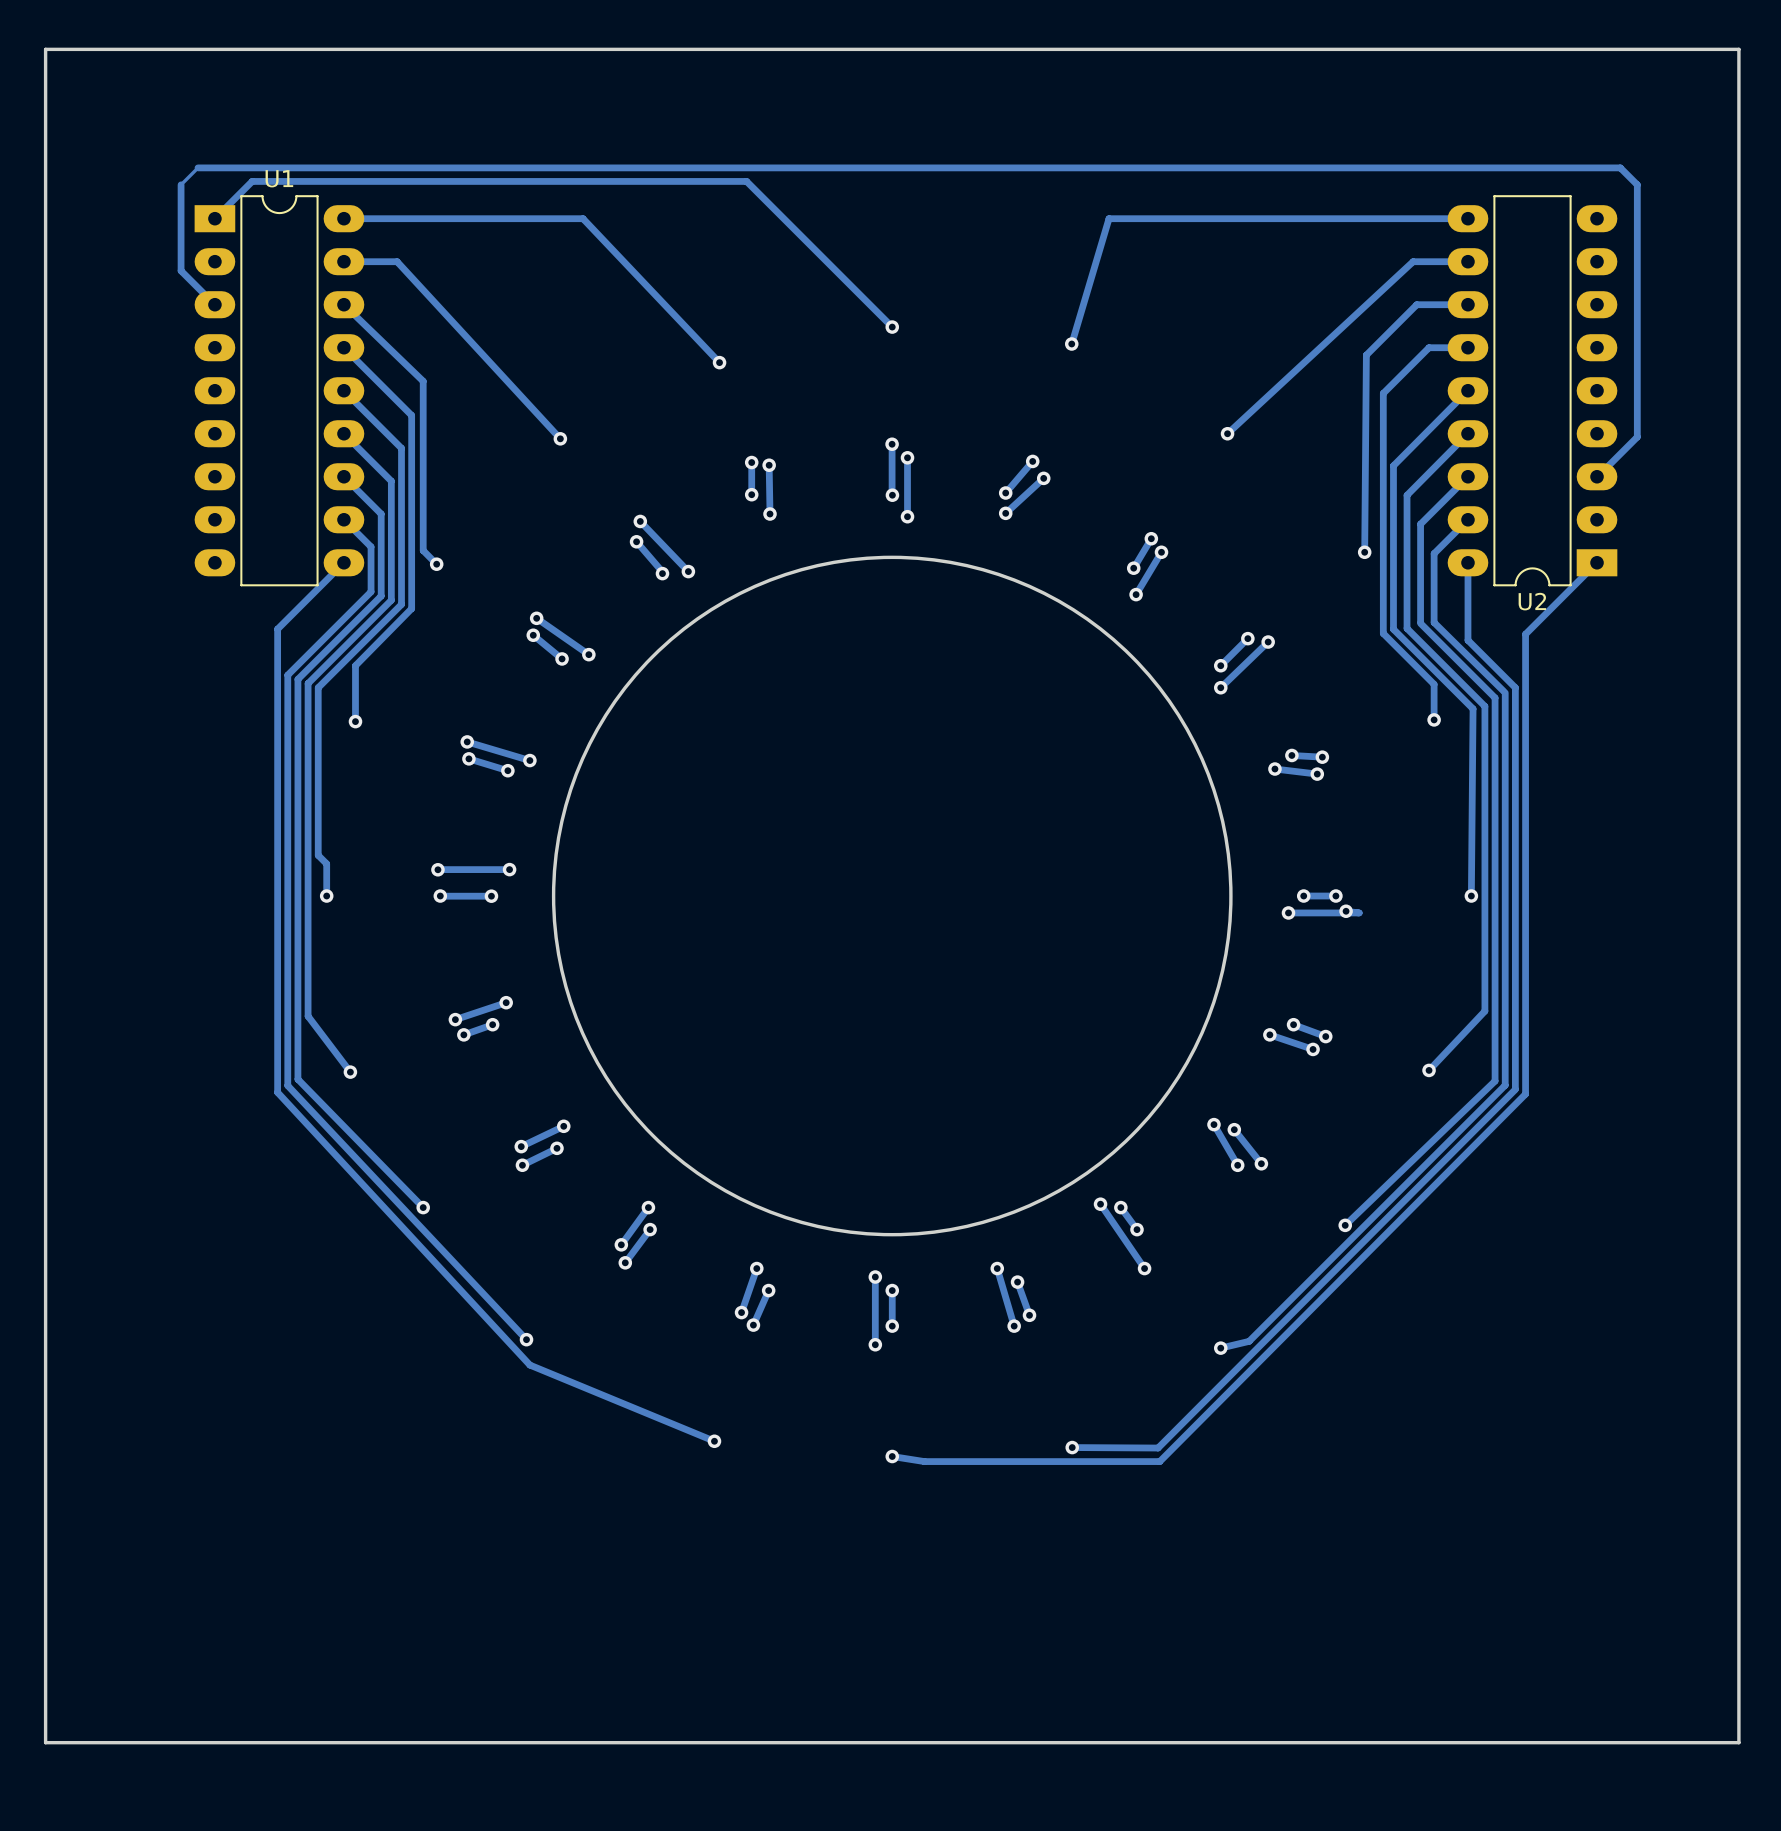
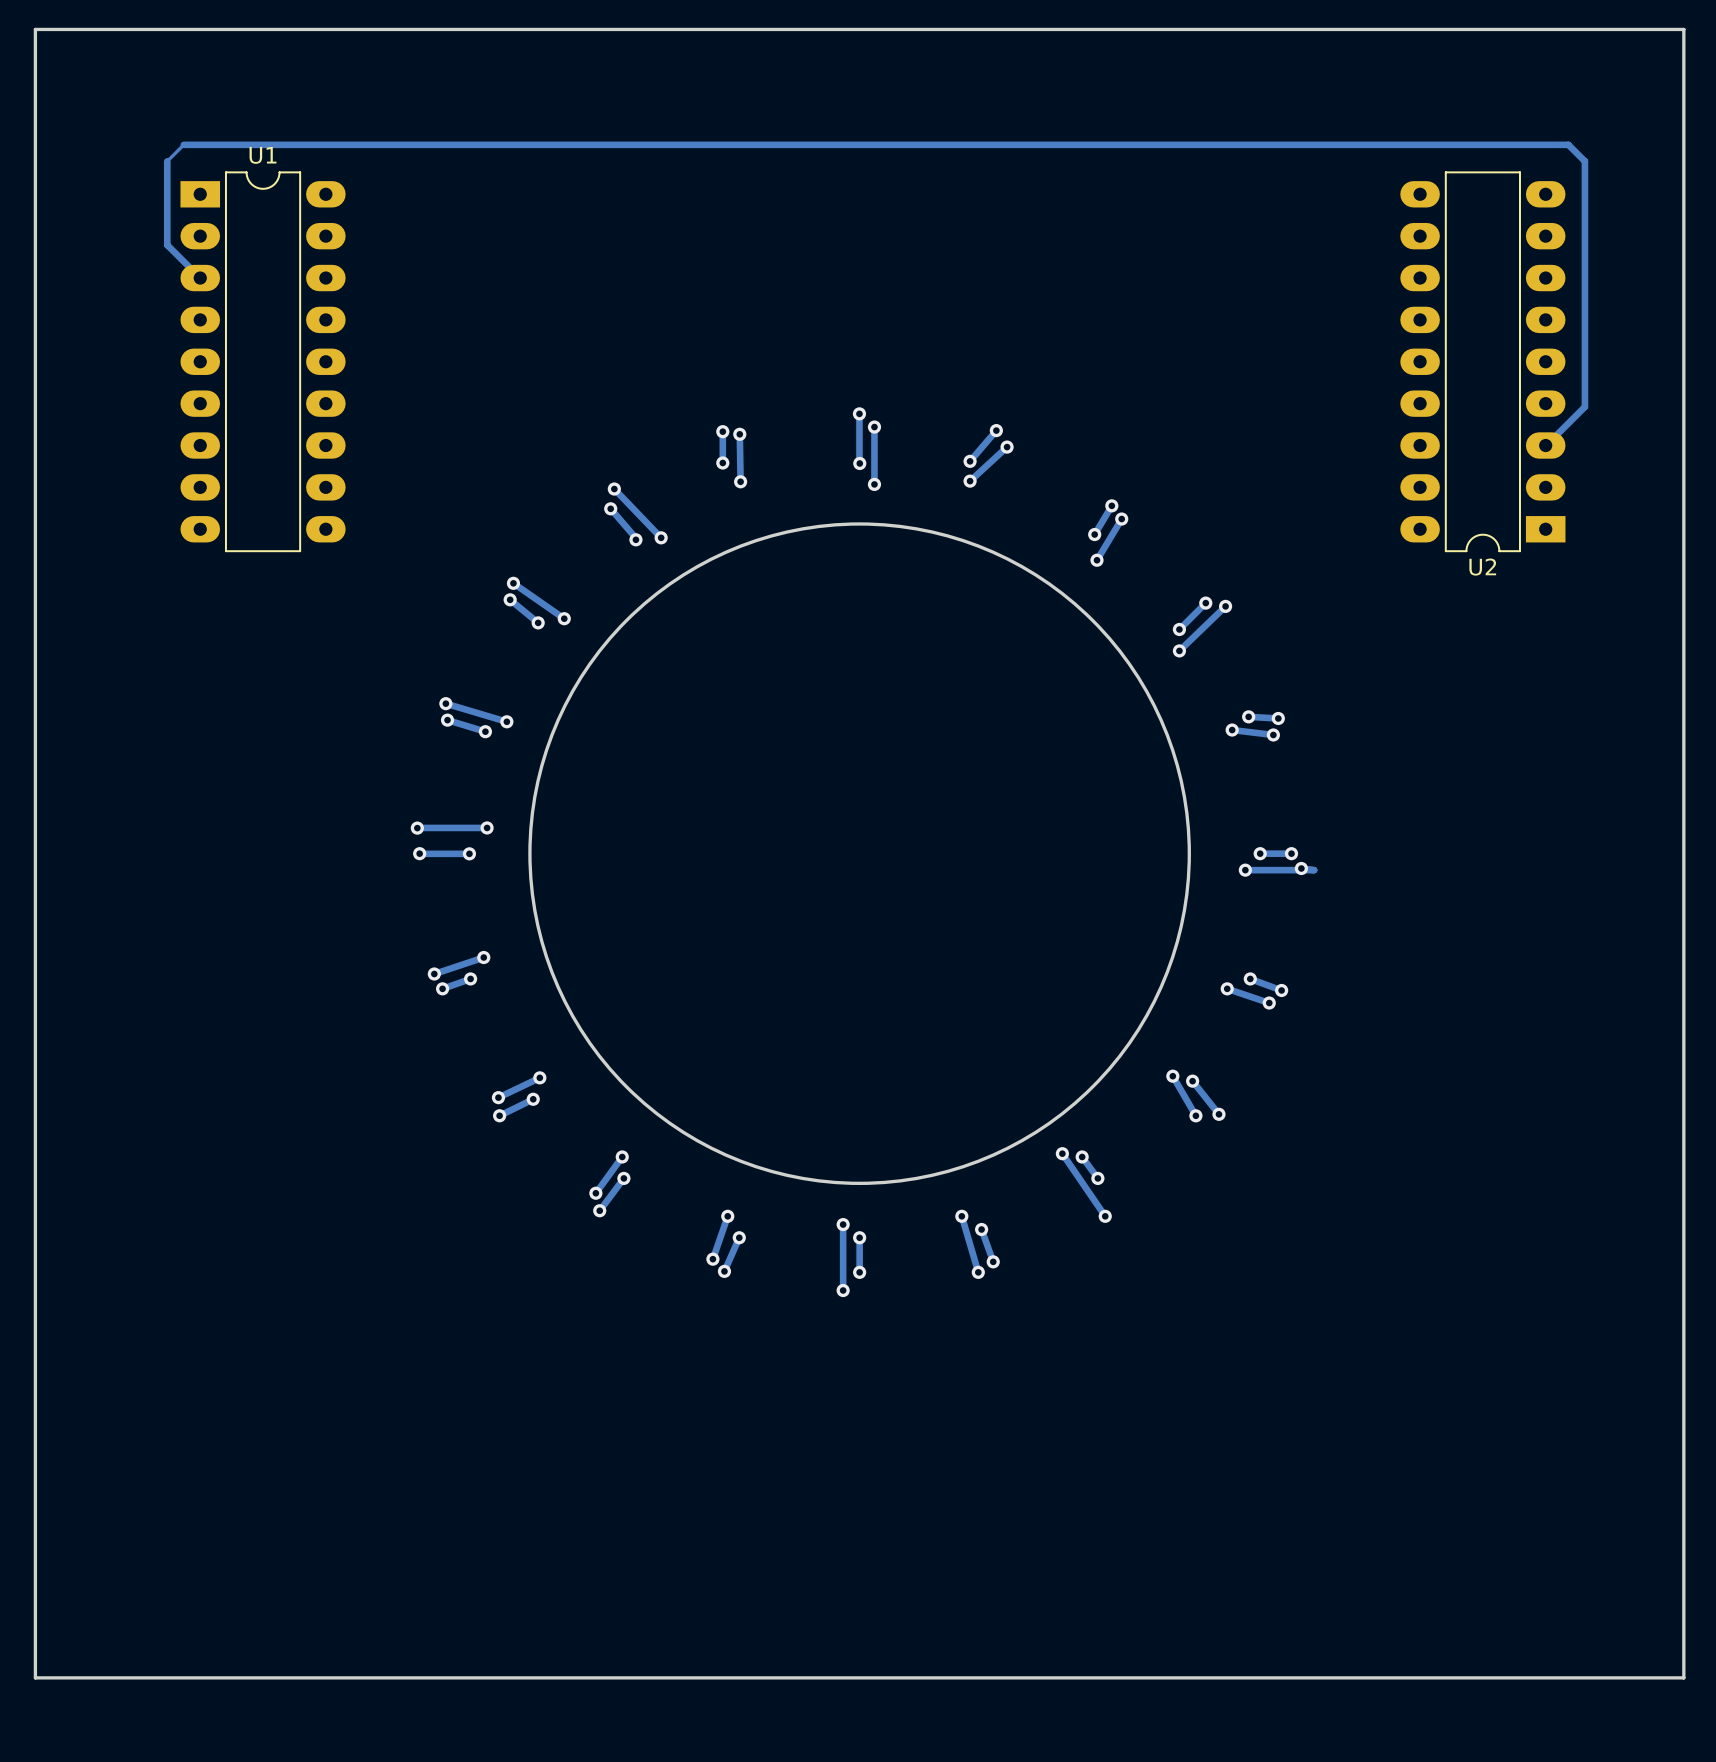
track: (214, 218) (252, 181) (746, 181) (892, 327) -> none
track: (343, 218) (583, 218) (719, 362) -> none
track: (1467, 218) (1109, 218) (1071, 344) -> none
track: (343, 261) (397, 261) (560, 438) -> none
track: (1468, 261) (1413, 261) (1227, 433) -> none
track: (343, 304) (423, 381) (423, 550) (436, 564) -> none
track: (1467, 304) (1416, 304) (1366, 355) (1364, 552) -> none
via: (892, 327) -> none
via: (1071, 344) -> none
track: (343, 347) (411, 415) (411, 608) (355, 665) (355, 721) -> none
track: (1467, 347) (1428, 347) (1383, 393) (1383, 633) (1434, 684) (1434, 719) -> none
via: (719, 362) -> none
track: (343, 390) (401, 448) (401, 604) (318, 687) (318, 855) (326, 863) (326, 896) -> none
track: (1467, 390) (1393, 465) (1393, 629) (1473, 708) (1471, 896) -> none
track: (343, 433) (391, 481) (391, 600) (308, 683) (308, 1016) (350, 1072) -> none
via: (1227, 433) -> none
track: (1467, 433) (1407, 495) (1407, 628) (1484, 706) (1484, 1011) (1429, 1070) -> none
via: (560, 438) -> none
track: (343, 476) (381, 513) (381, 596) (297, 679) (297, 1079) (423, 1207) -> none
track: (1467, 476) (1420, 524) (1420, 621) -> none
track: (343, 519) (371, 546) (371, 591) (287, 675) (287, 1085) (526, 1339) -> none
track: (1467, 519) (1434, 553) (1434, 622) (1503, 691) -> none
via: (1364, 552) -> none
track: (343, 562) (277, 629) (277, 1092) (529, 1365) (714, 1441) -> none
track: (1467, 562) (1467, 640) (1515, 687) (1515, 1089) -> none
track: (1597, 562) (1525, 634) (1525, 1094) (1159, 1461) (924, 1461) (892, 1456) -> none
via: (436, 564) -> none
track: (1420, 623) (1495, 697) (1495, 1081) (1345, 1225) -> none
track: (1505, 692) (1505, 1085) (1249, 1341) (1220, 1348) -> none
via: (1434, 719) -> none
via: (355, 721) -> none
via: (326, 896) -> none
via: (1471, 896) -> none
via: (1429, 1070) -> none
via: (350, 1072) -> none
track: (1515, 1089) (1158, 1448) (1072, 1447) -> none
via: (423, 1207) -> none
via: (1345, 1225) -> none
via: (526, 1339) -> none
via: (1220, 1348) -> none
via: (714, 1441) -> none
via: (1072, 1447) -> none
via: (892, 1456) -> none

